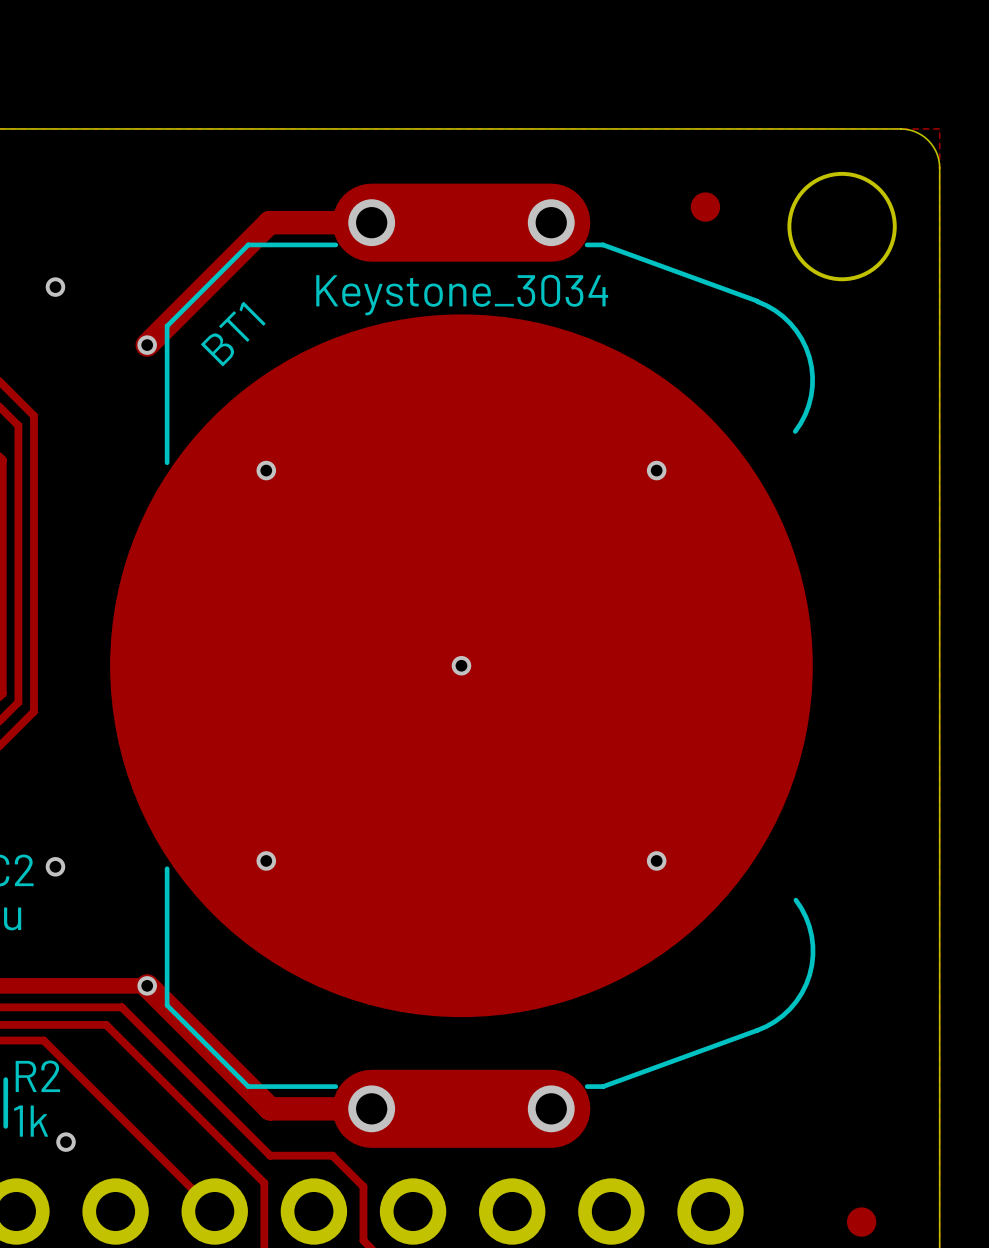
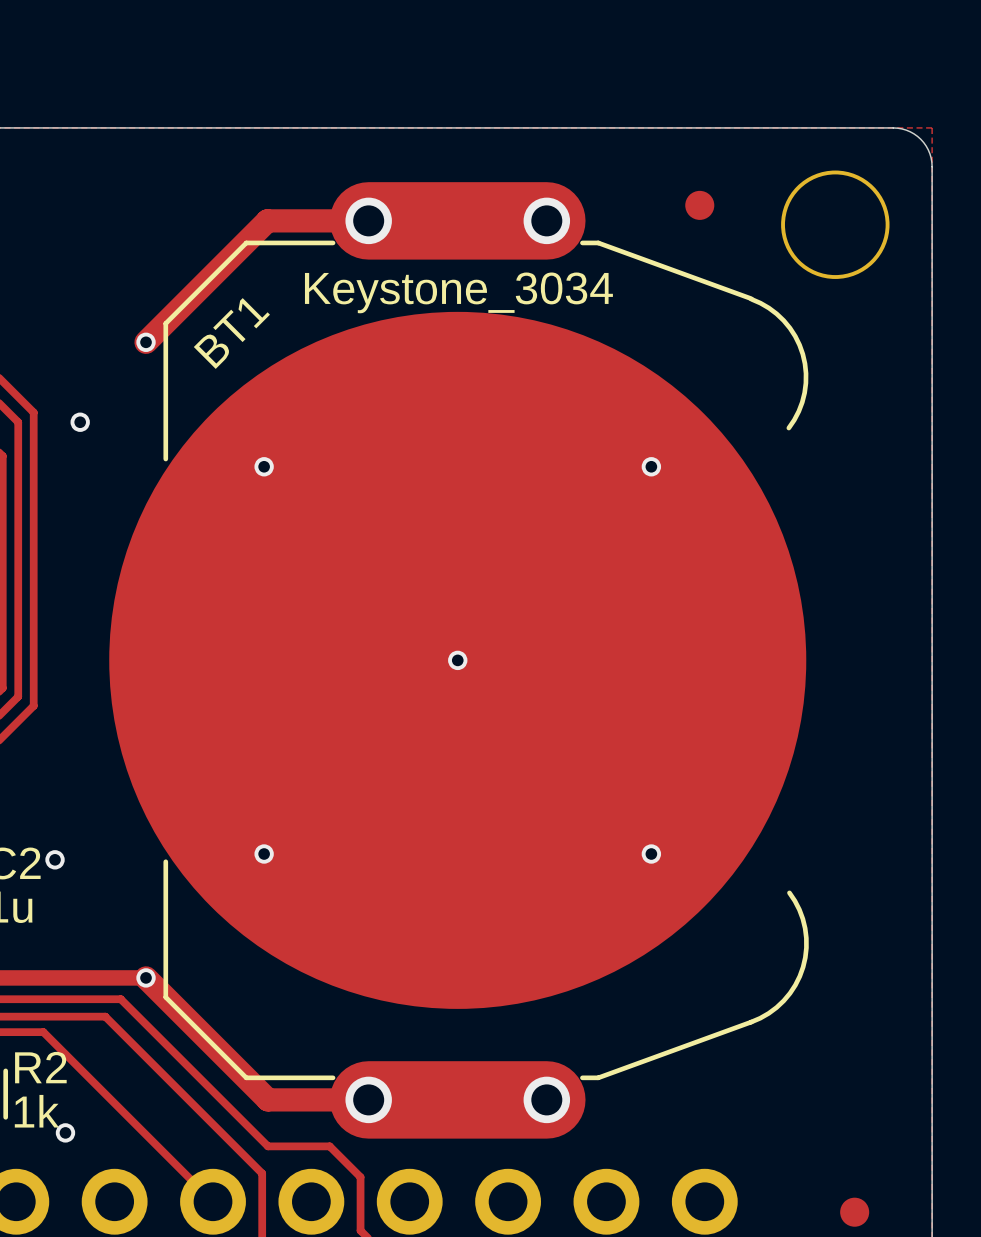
via position: (55, 287) -> (80, 422)

